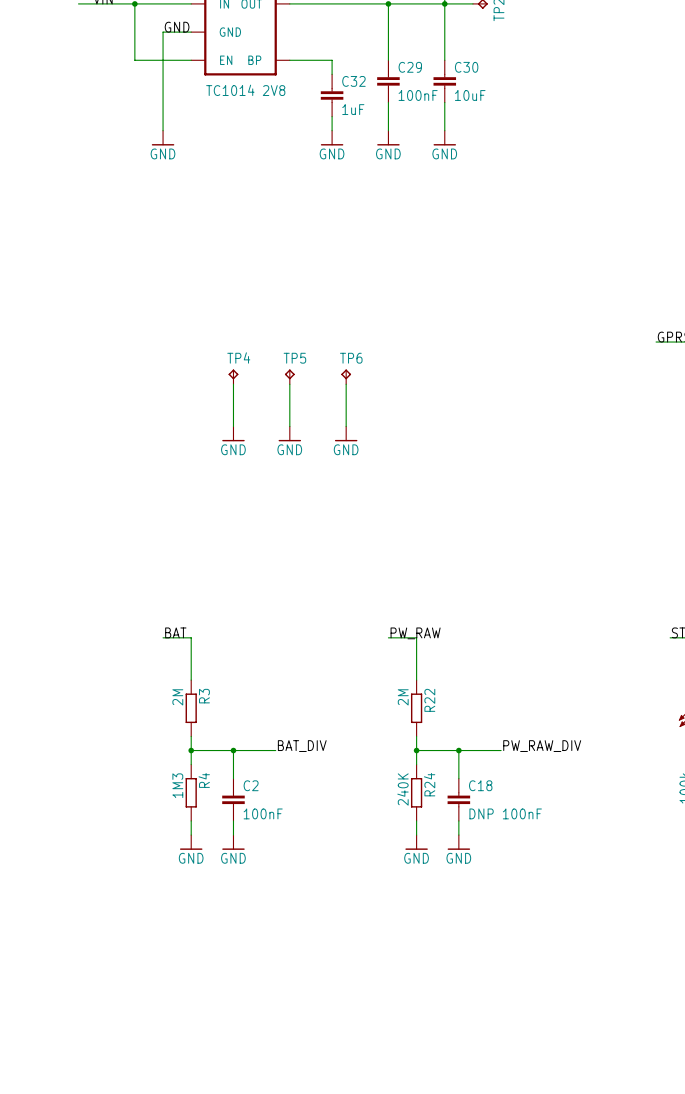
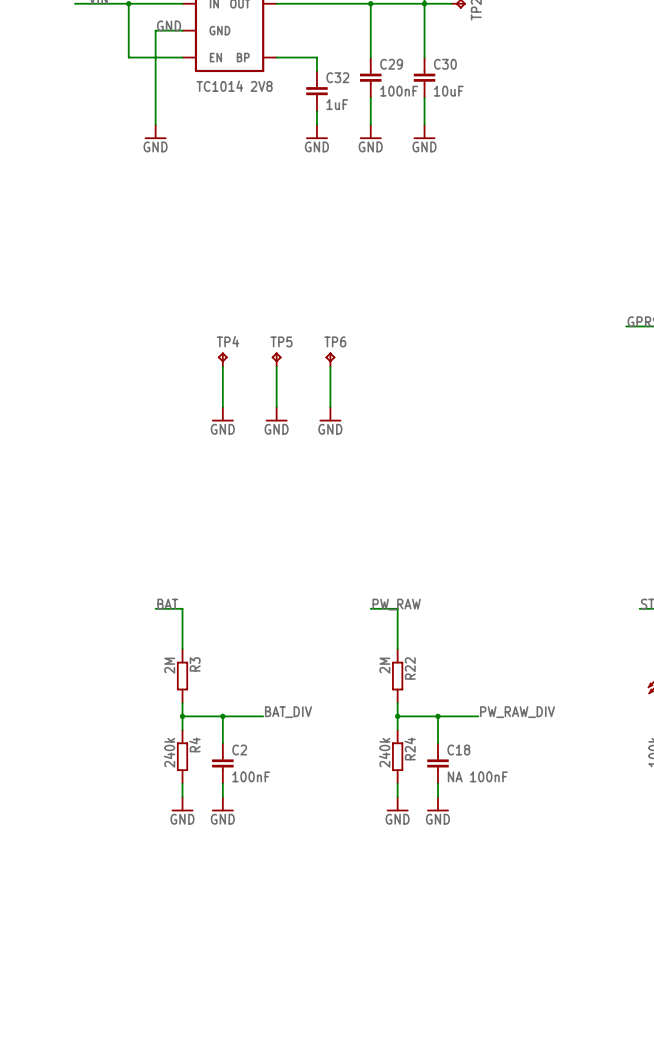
R4 value: 1M3 (177, 785) -> 240k (169, 752)
R24 value: 240K (402, 789) -> 240k (384, 752)
C18 value: DNP 100nF (505, 813) -> NA 100nF (477, 776)

